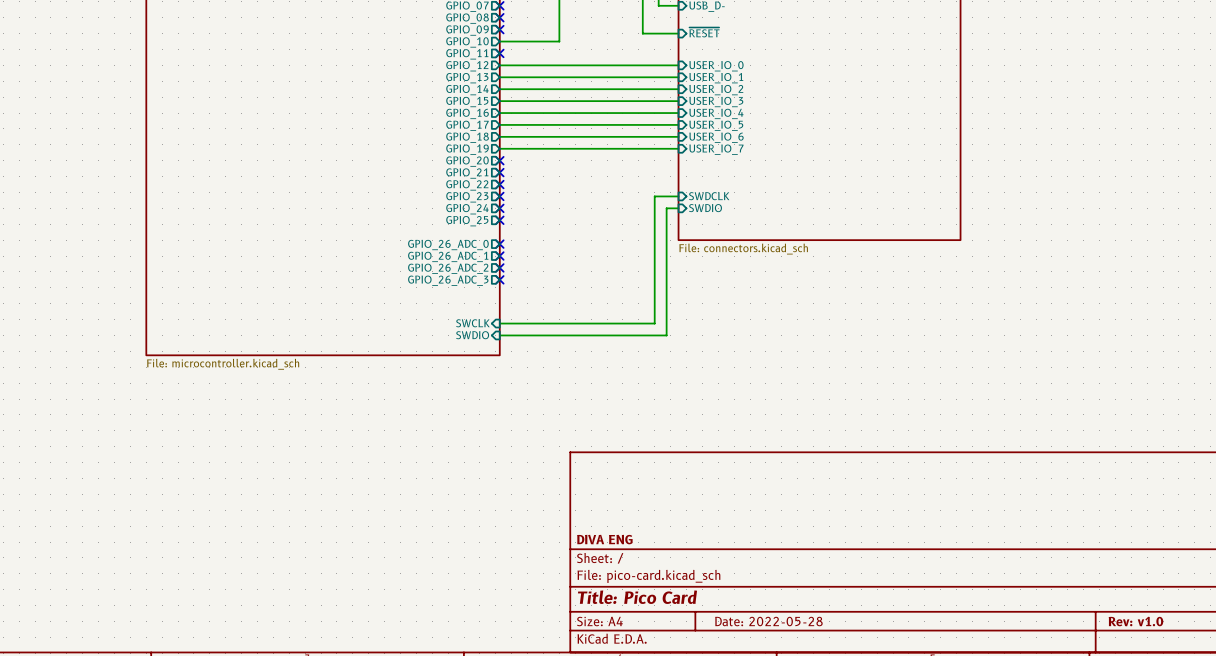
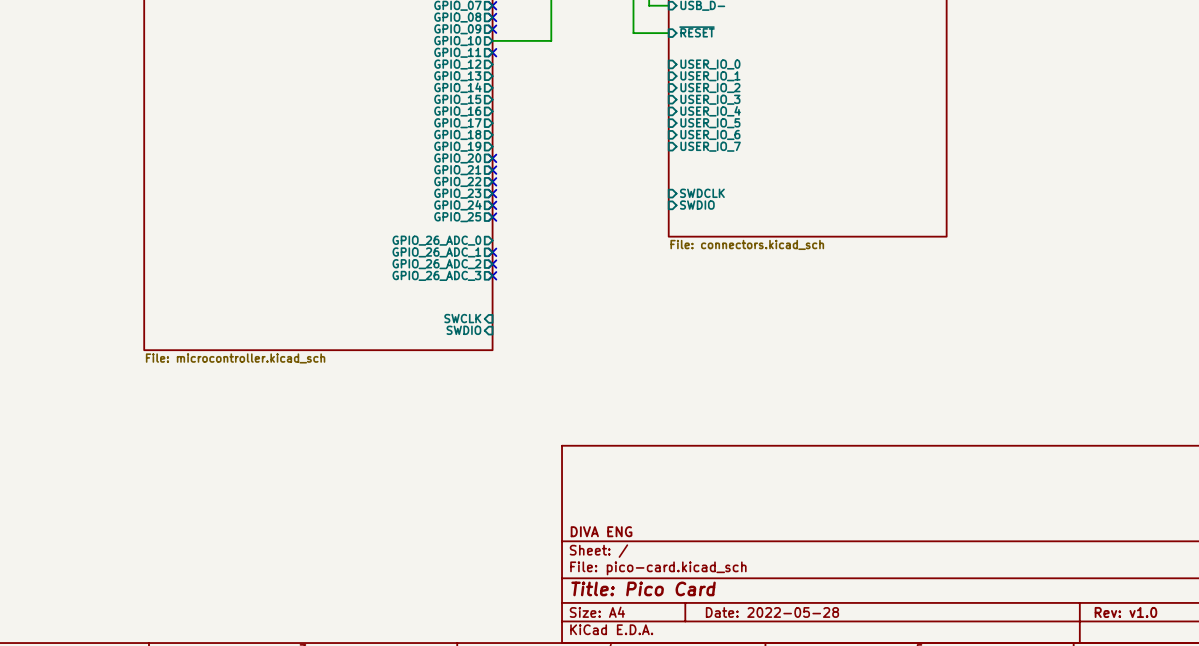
wire: (499, 65) (678, 65) -> none
wire: (499, 77) (678, 77) -> none
wire: (499, 89) (678, 89) -> none
wire: (499, 101) (678, 101) -> none
wire: (499, 113) (678, 113) -> none
wire: (499, 124) (678, 124) -> none
wire: (499, 136) (678, 136) -> none
wire: (499, 148) (678, 148) -> none
wire: (678, 196) (654, 196) (654, 323) (499, 323) -> none
wire: (678, 208) (666, 208) (666, 335) (499, 335) -> none
no-connect mark: (499, 244) -> none

